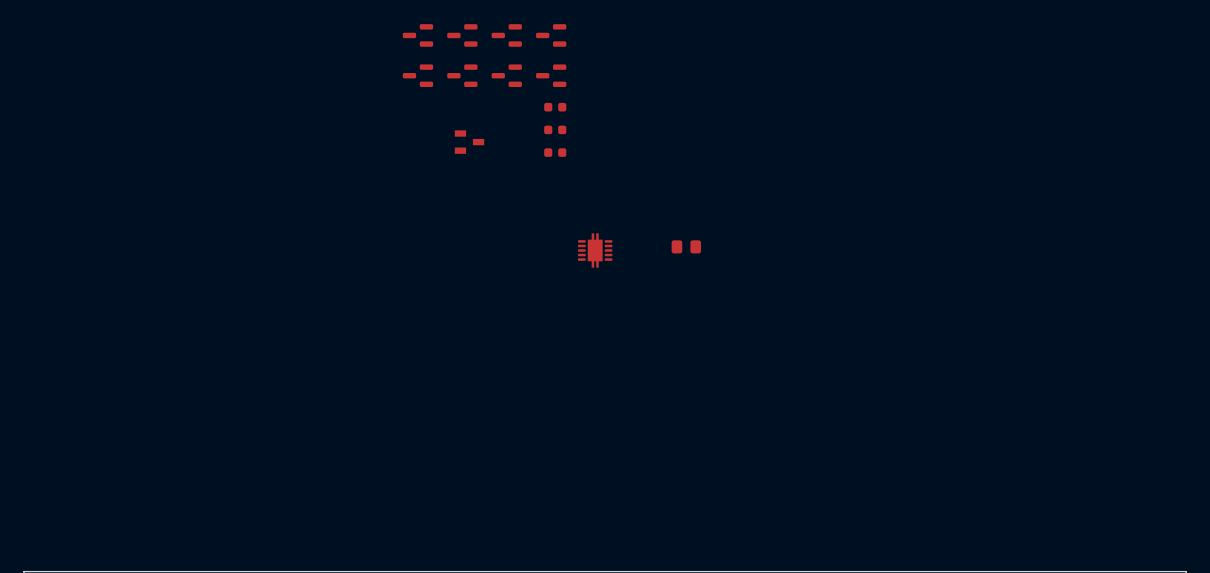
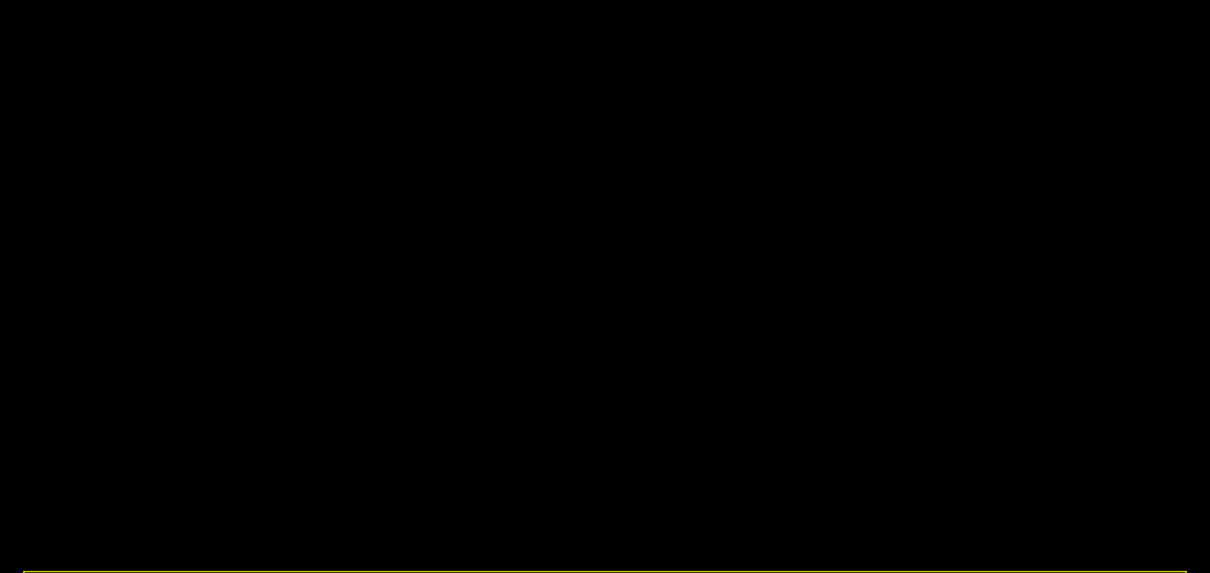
part: (417, 35) -> none
part: (462, 35) -> none
part: (506, 35) -> none
part: (551, 35) -> none
part: (417, 75) -> none
part: (462, 75) -> none
part: (506, 75) -> none
part: (551, 75) -> none
part: (555, 107) -> none
part: (555, 129) -> none
part: (469, 142) -> none
part: (555, 152) -> none
part: (686, 246) -> none
part: (595, 250) -> none

